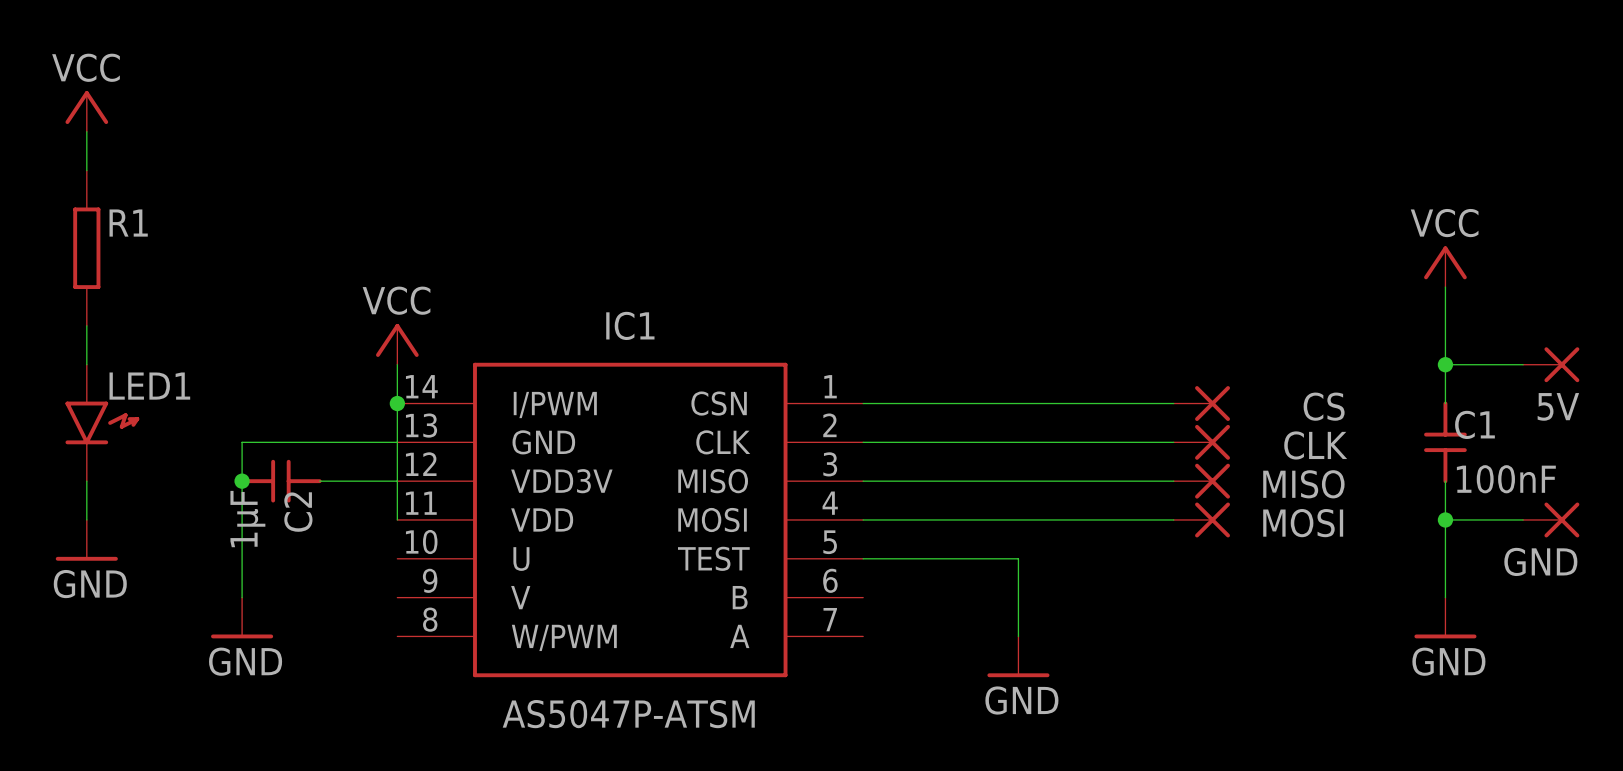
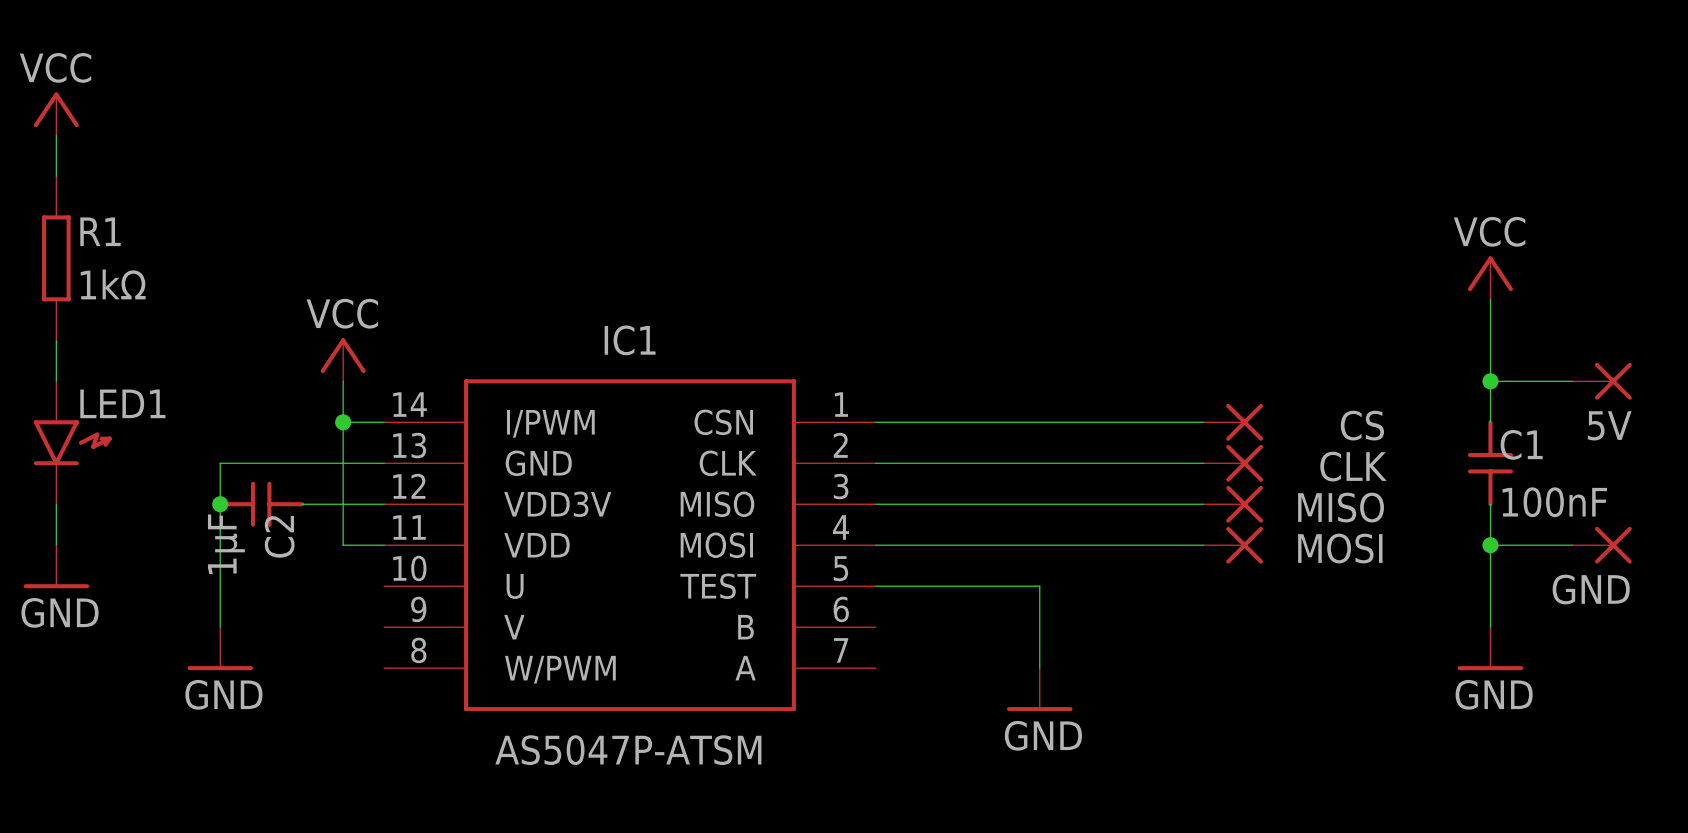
R1 value: none -> 1kΩ (113, 284)
power symbol position: VCC (397, 344) -> VCC (343, 359)
wire: (397, 364) (397, 519) -> (343, 381) (343, 545) (384, 545)
wire: none -> (343, 422) (384, 422)
junction position: (397, 403) -> (343, 422)

